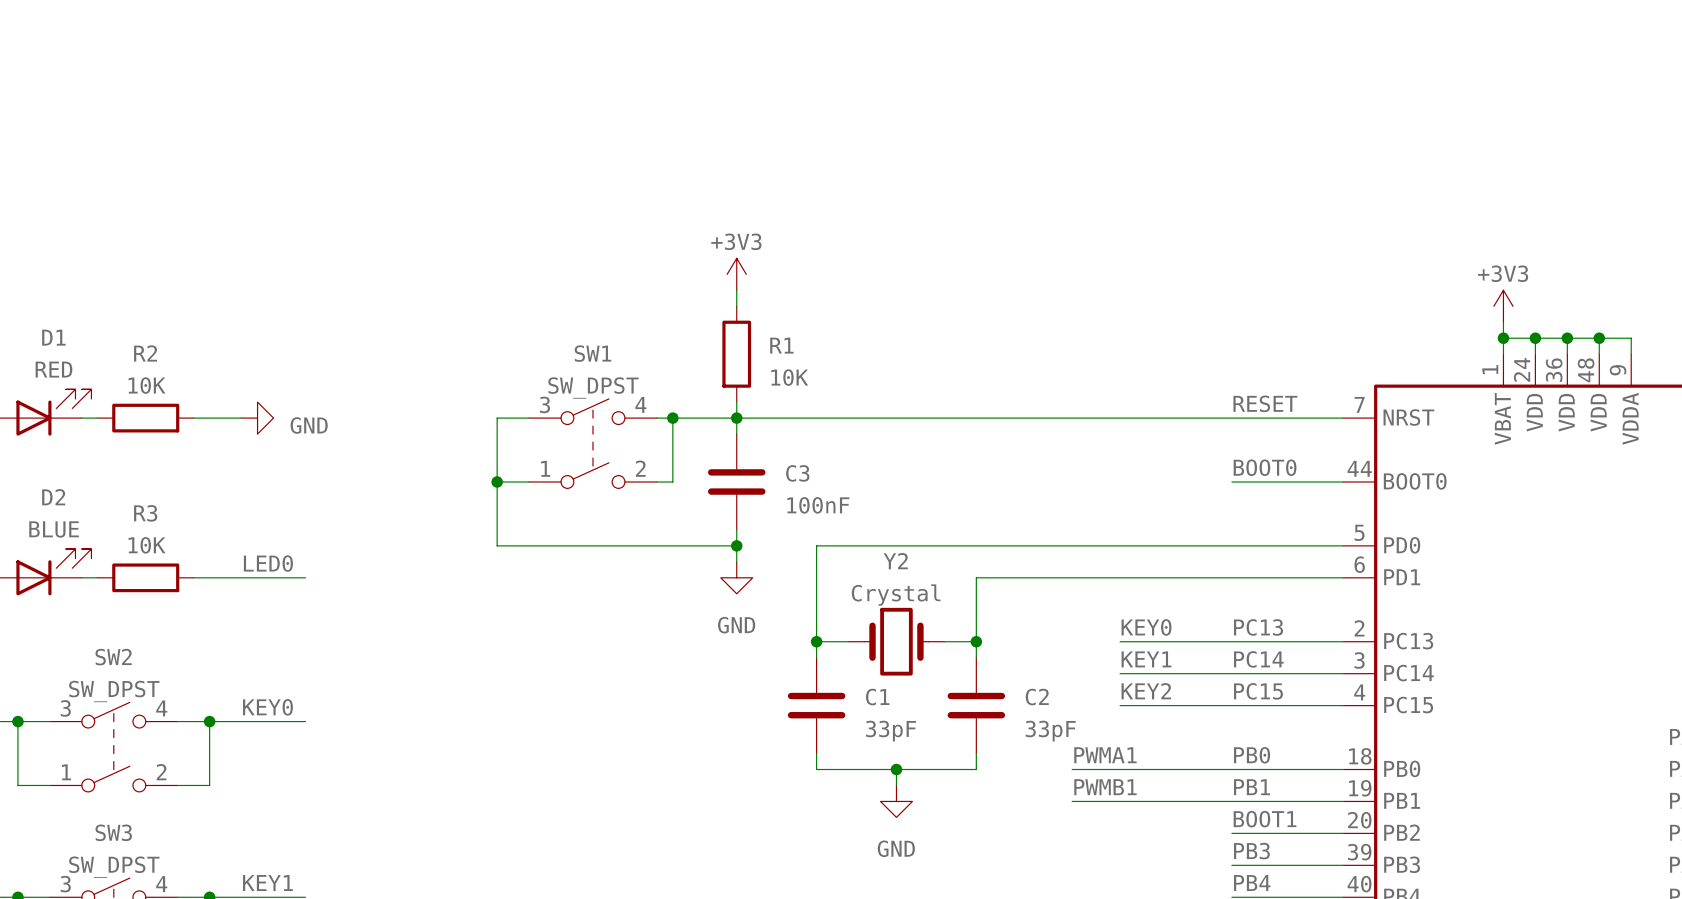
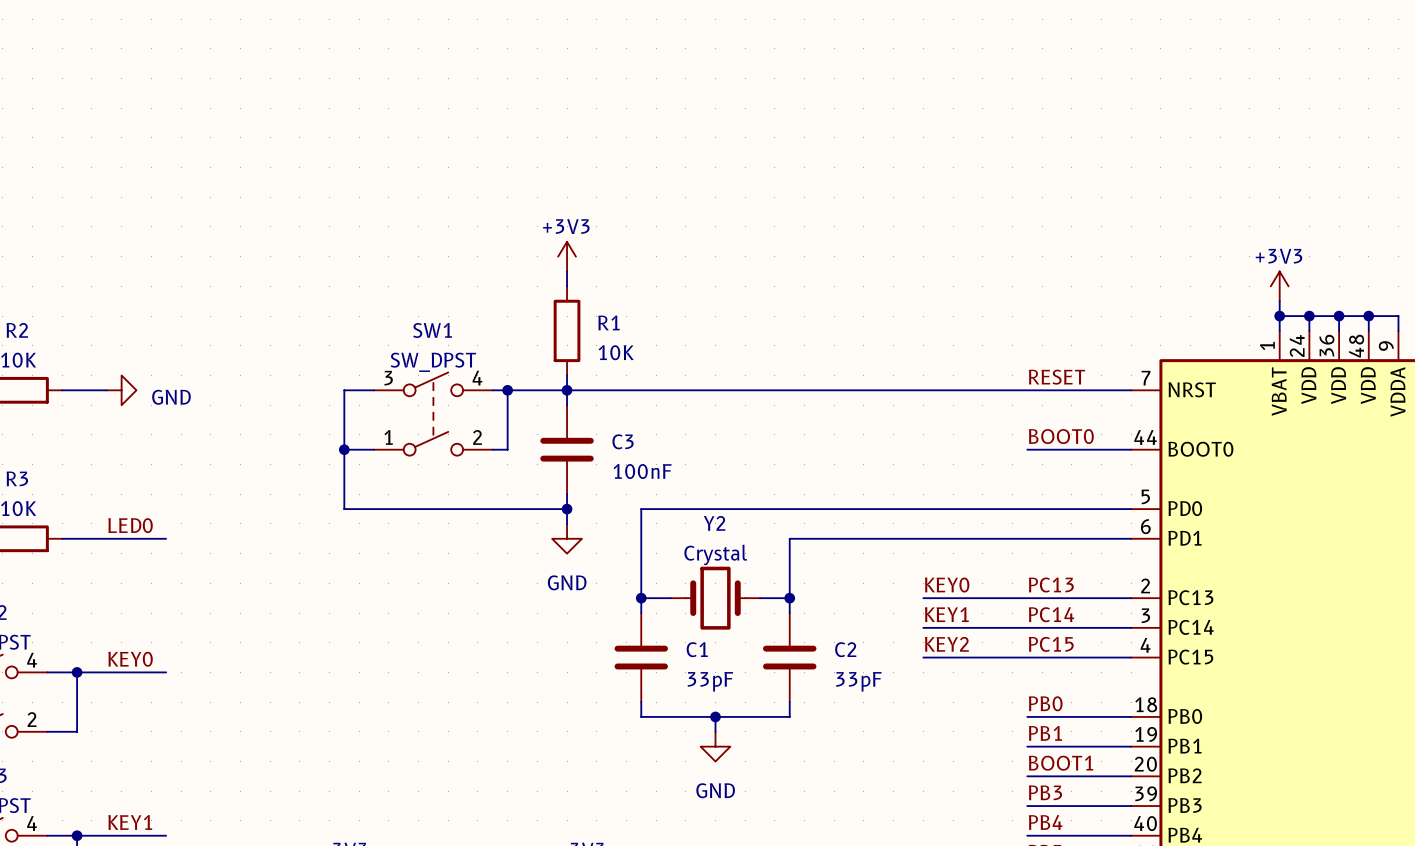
label: PWMA1 (1105, 755) -> none
wire: (1072, 769) (1231, 769) -> none
label: PWMB1 (1105, 787) -> none
wire: (1072, 801) (1231, 801) -> none

